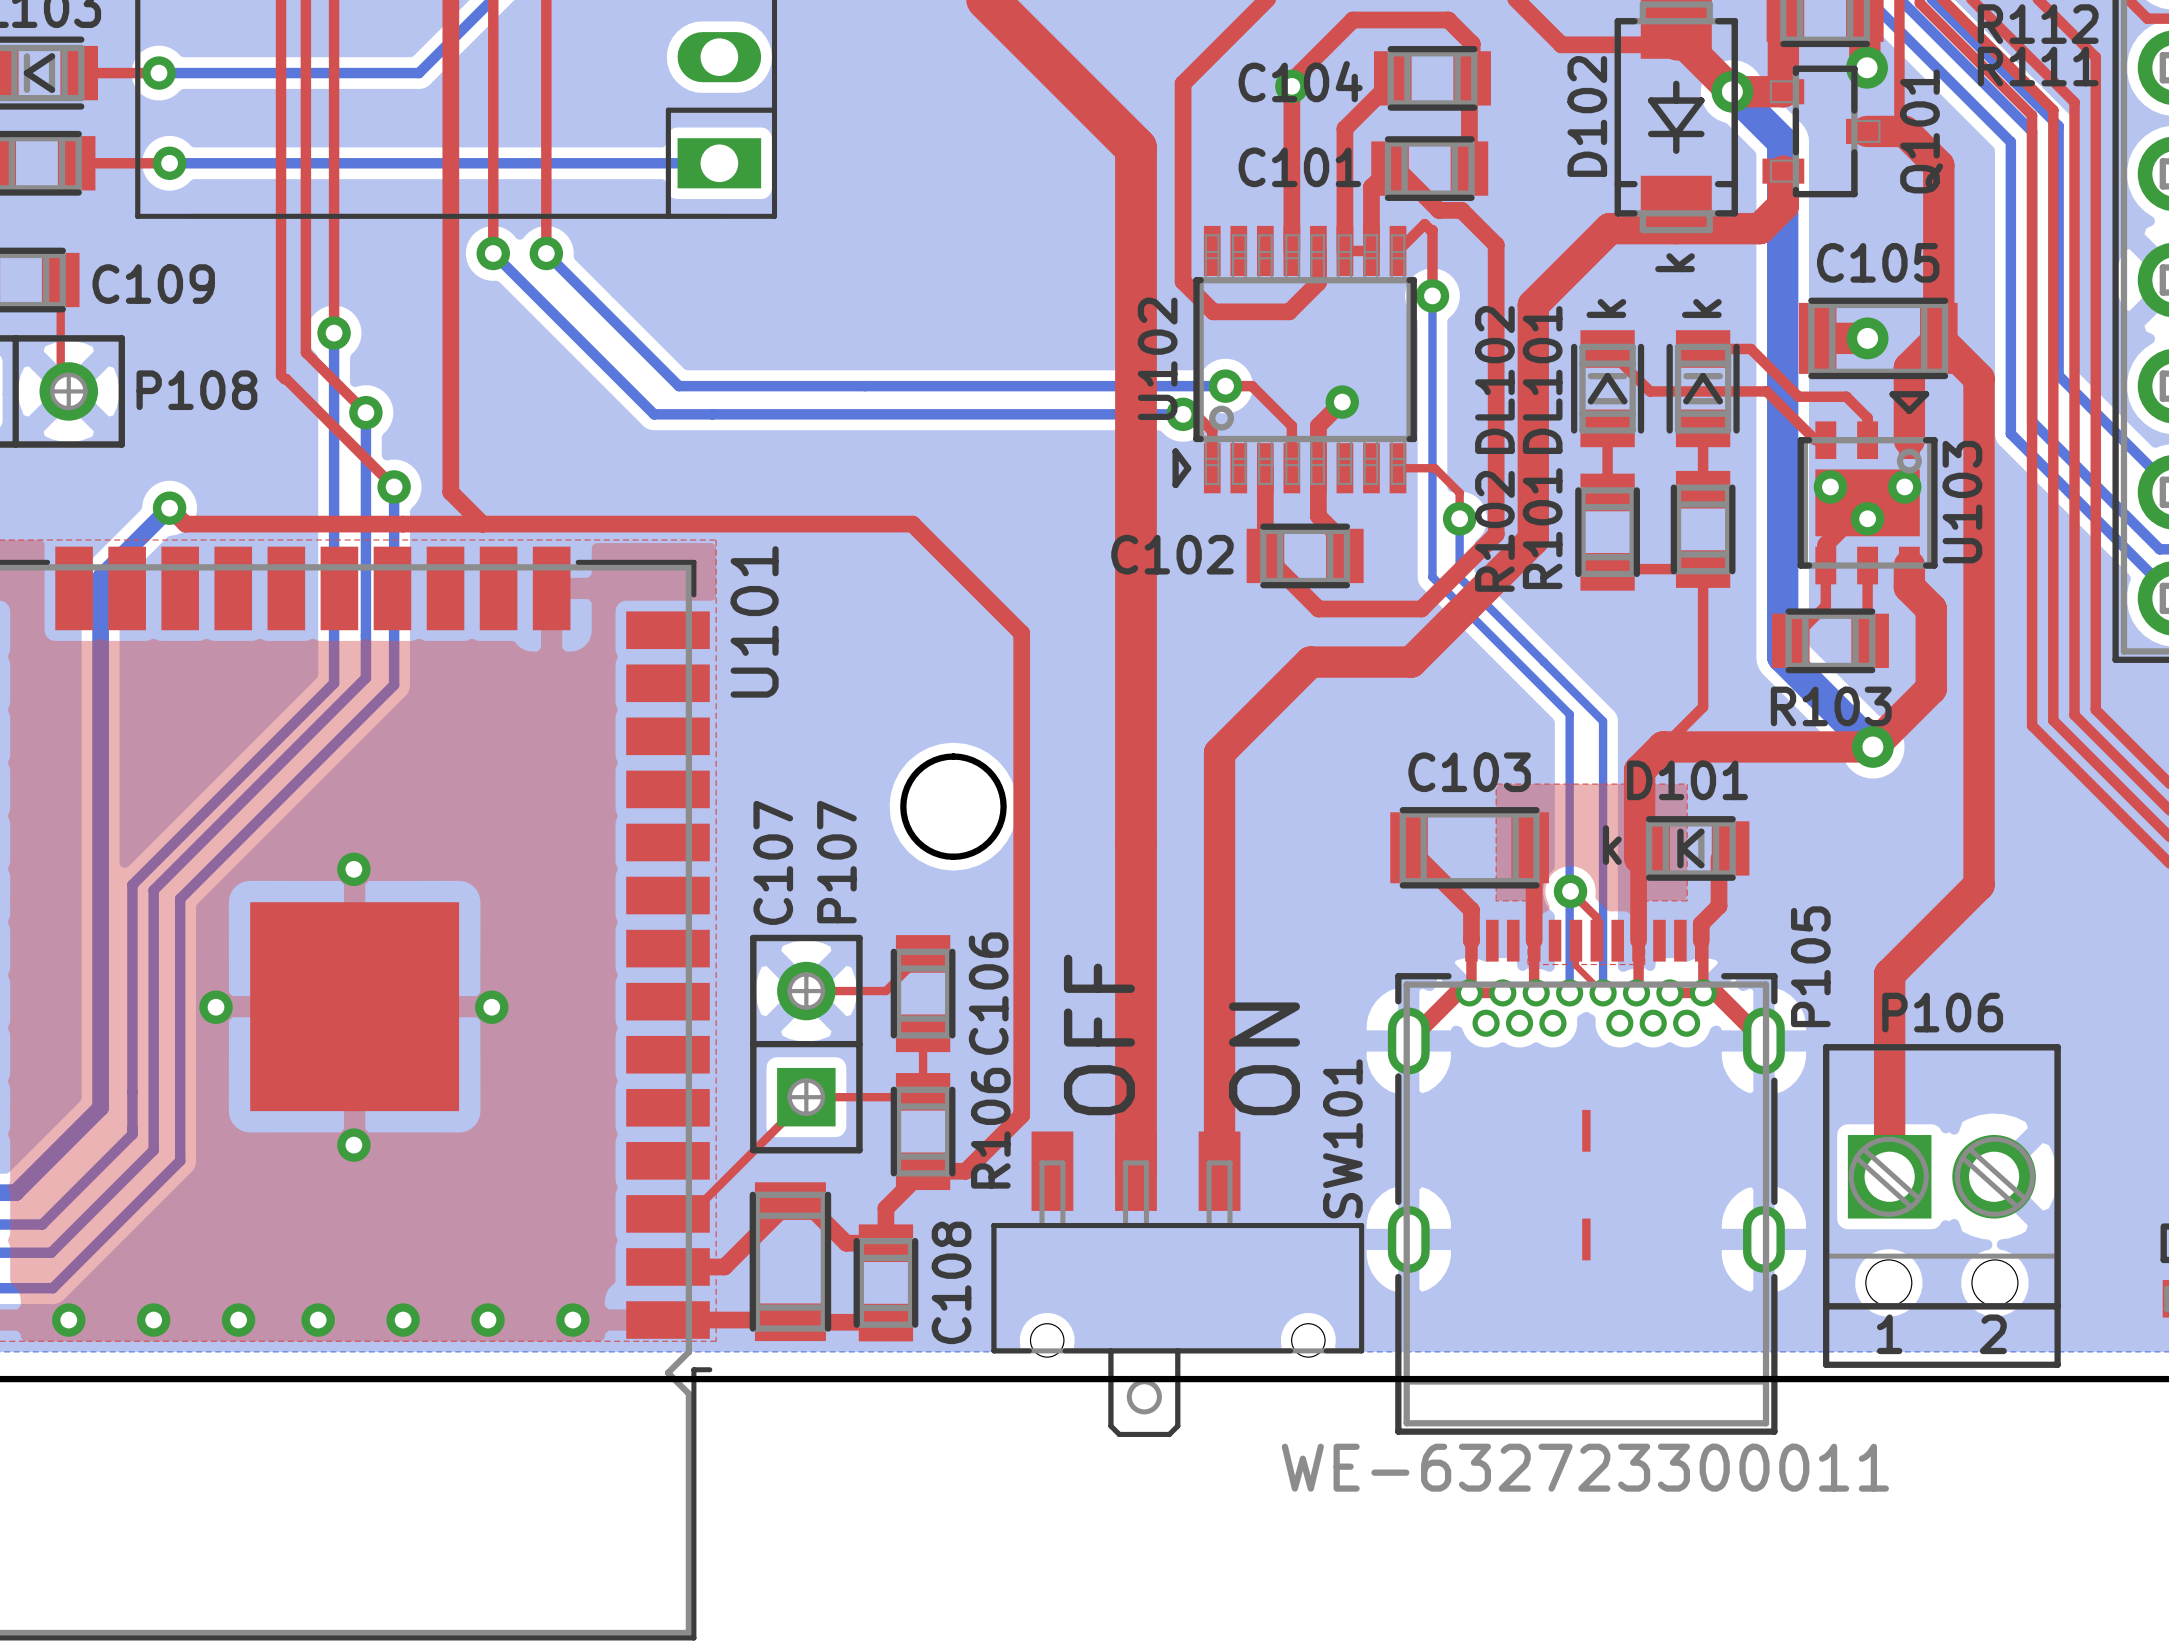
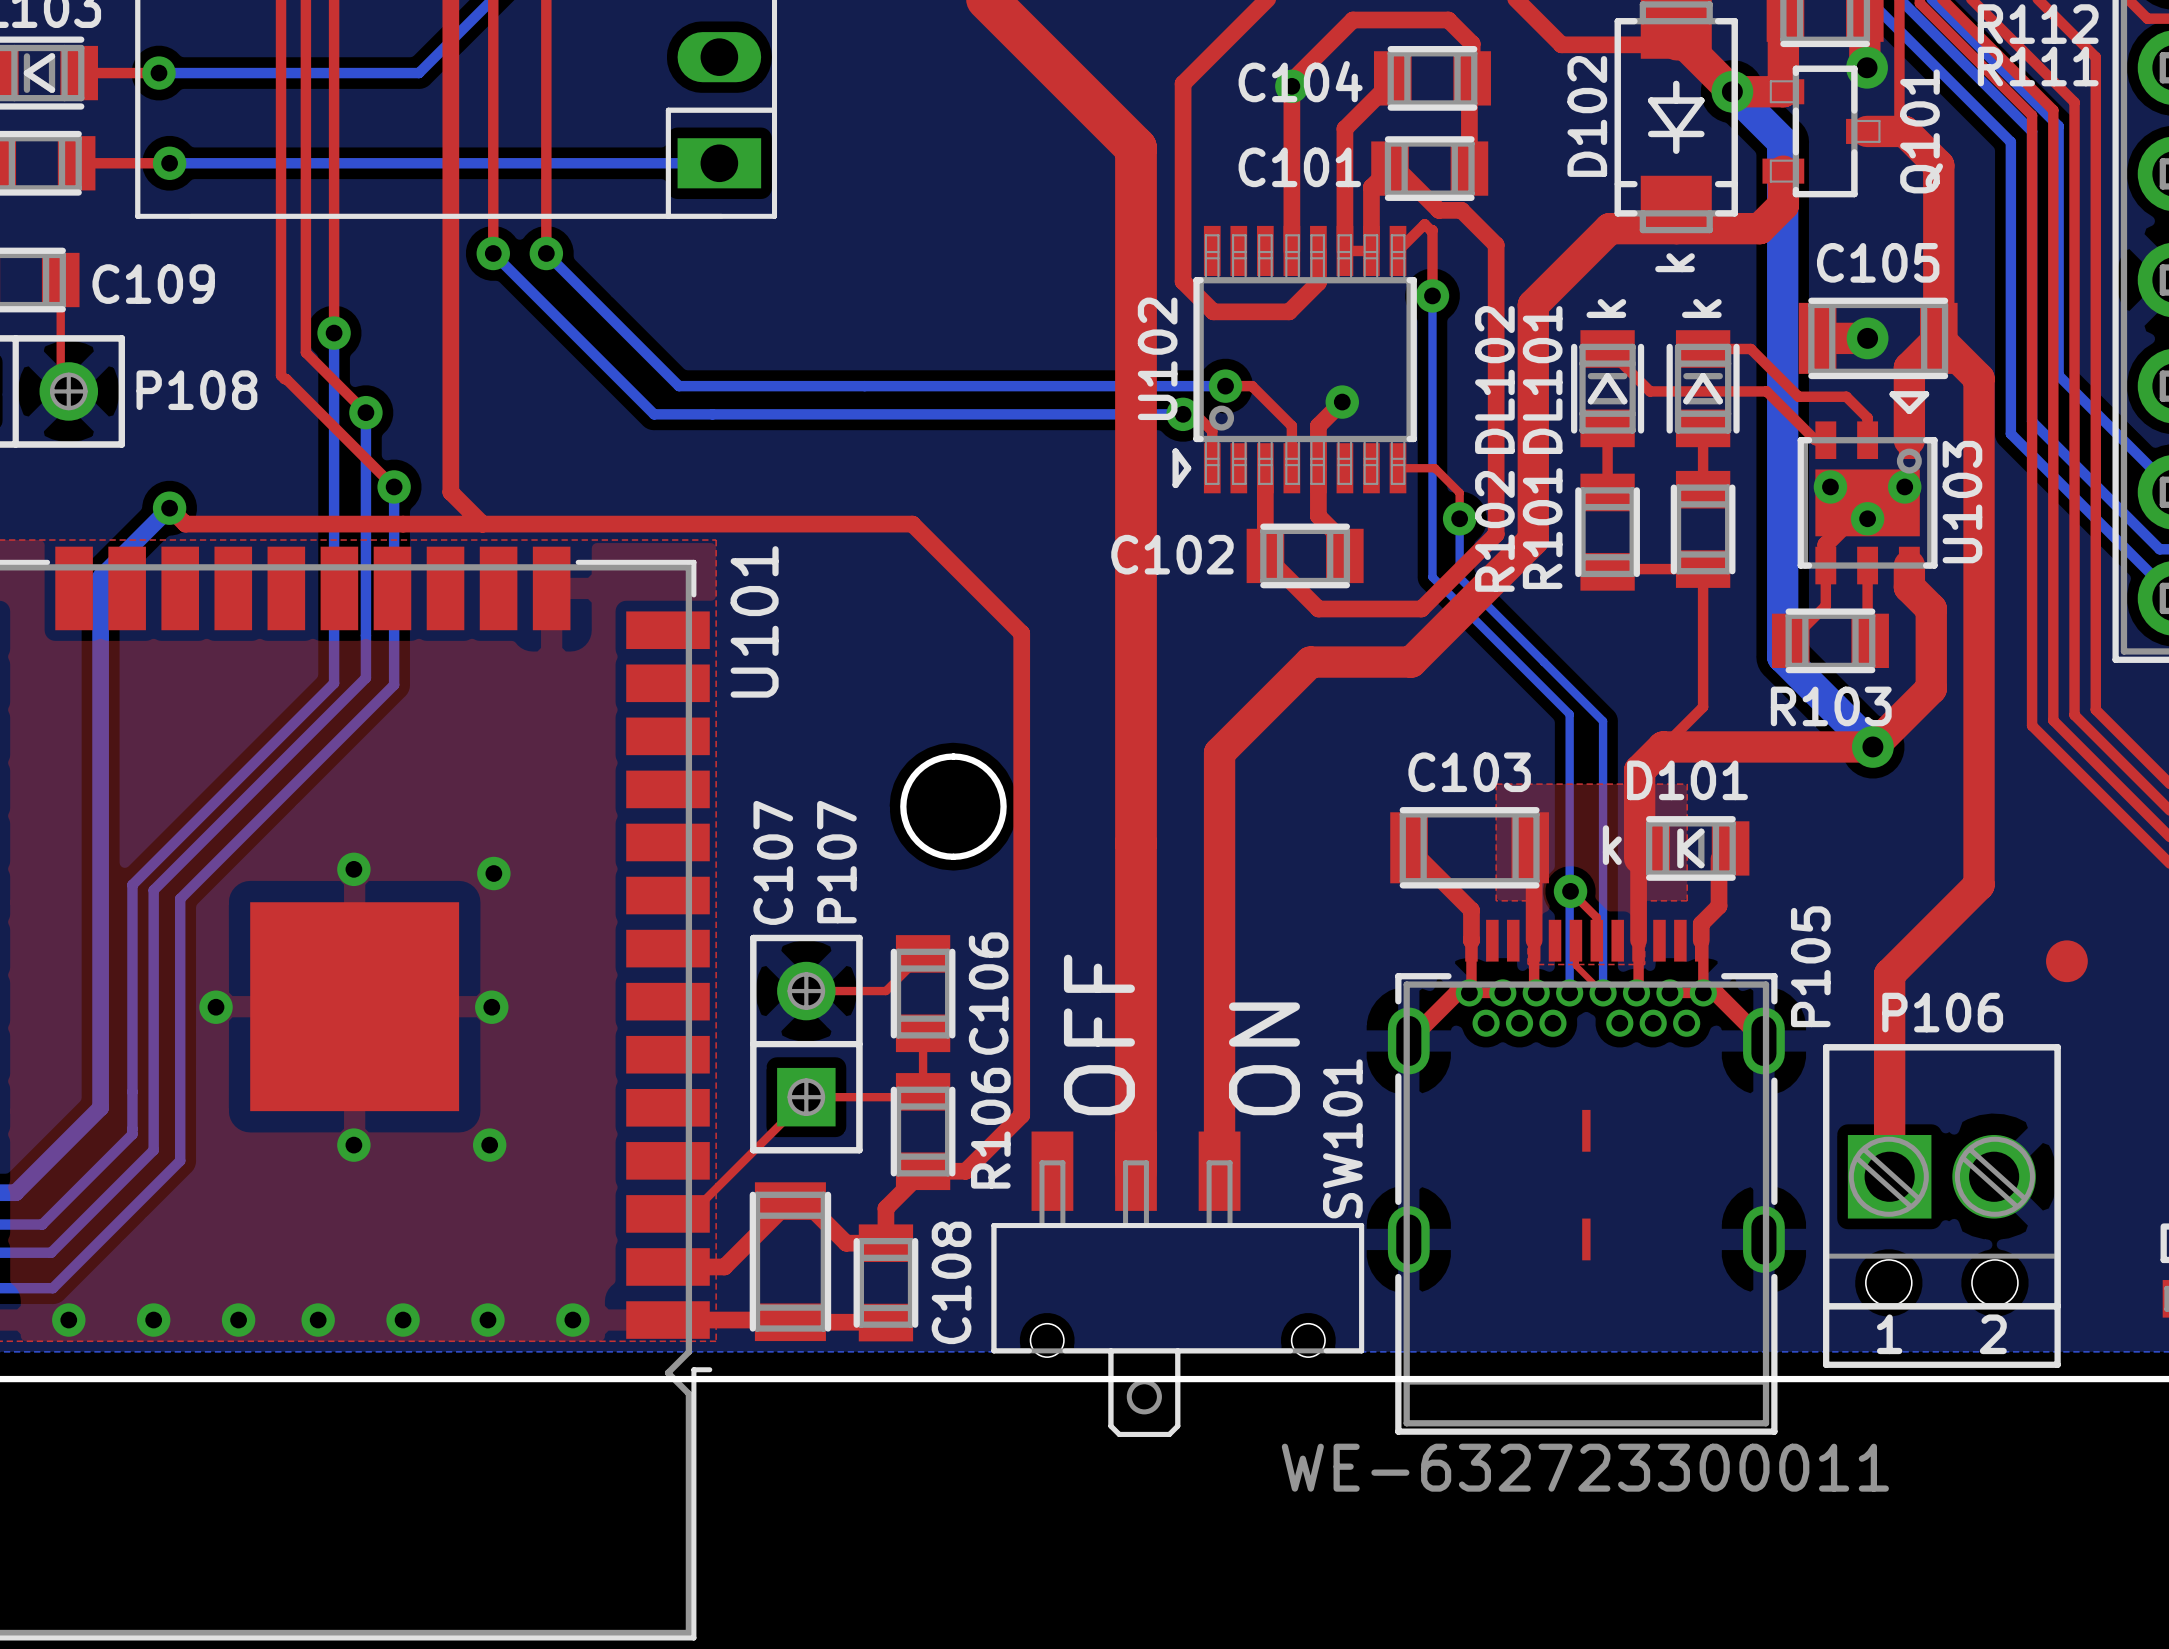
via: none -> (493, 873)
part: none -> (2066, 961)
via: none -> (489, 1145)

